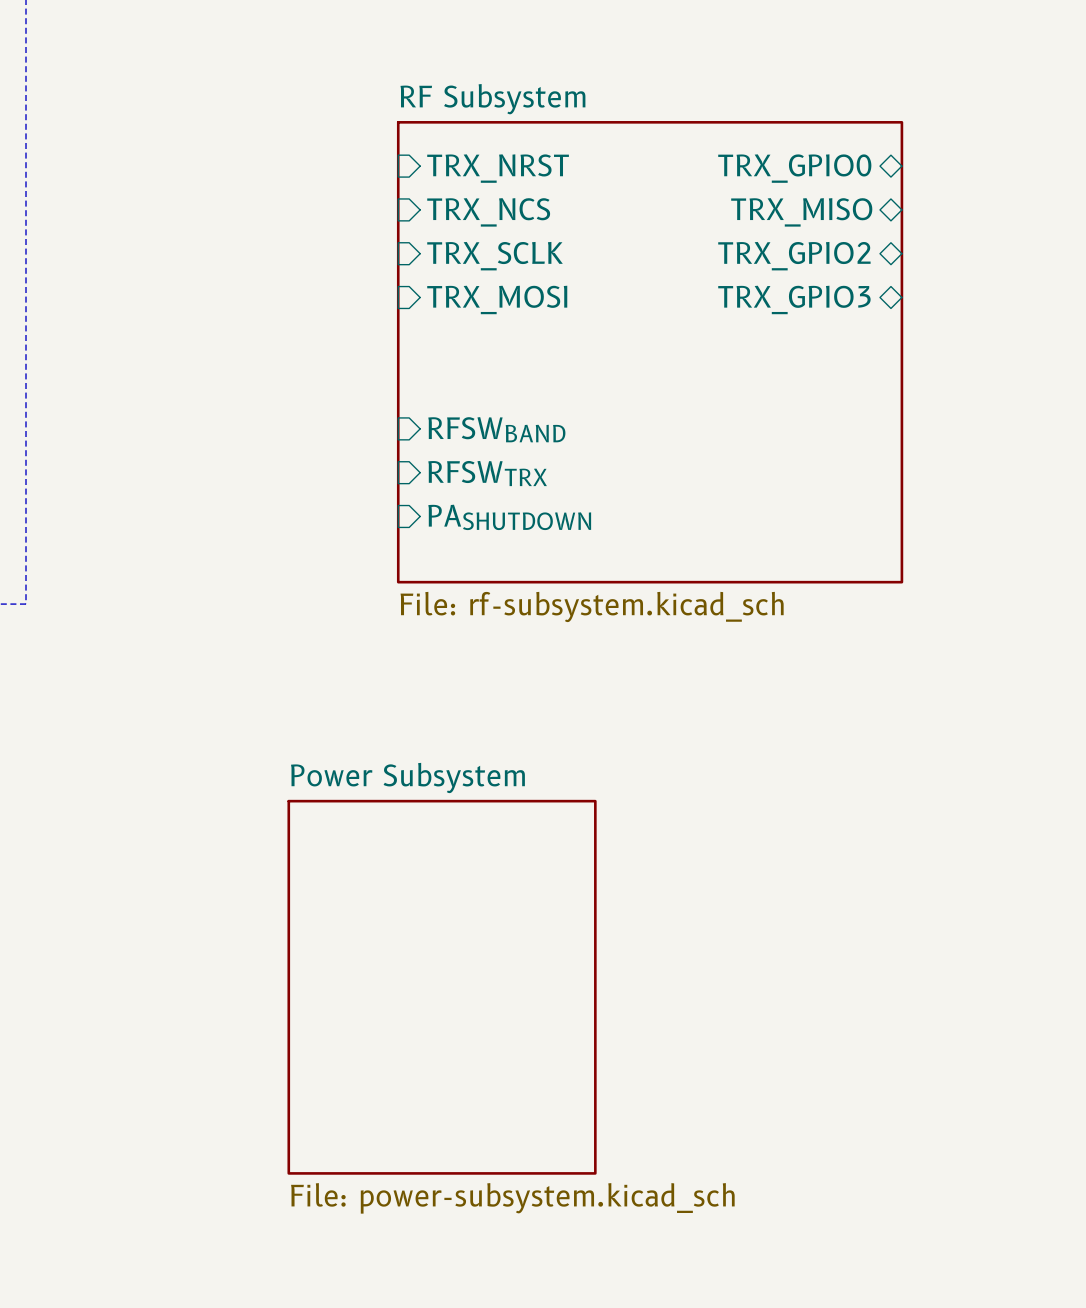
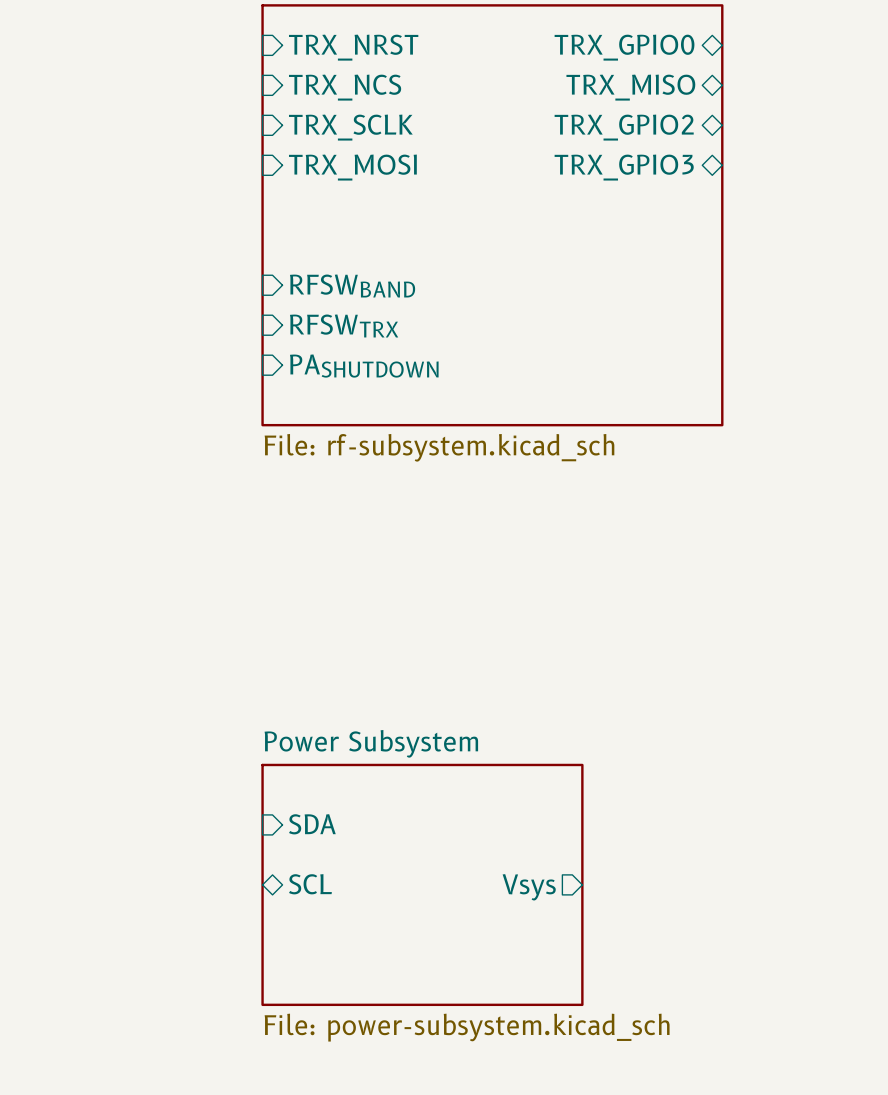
sheet Power Subsystem: File: power-subsystem.kicad_sch (442, 987) -> none
sheet pin: none -> SDA (312, 824)
sheet pin: none -> SCL (310, 884)
sheet Power Subsystem: none -> File: power-subsystem.kicad_sch (422, 884)
sheet pin: none -> Vsys (529, 887)

